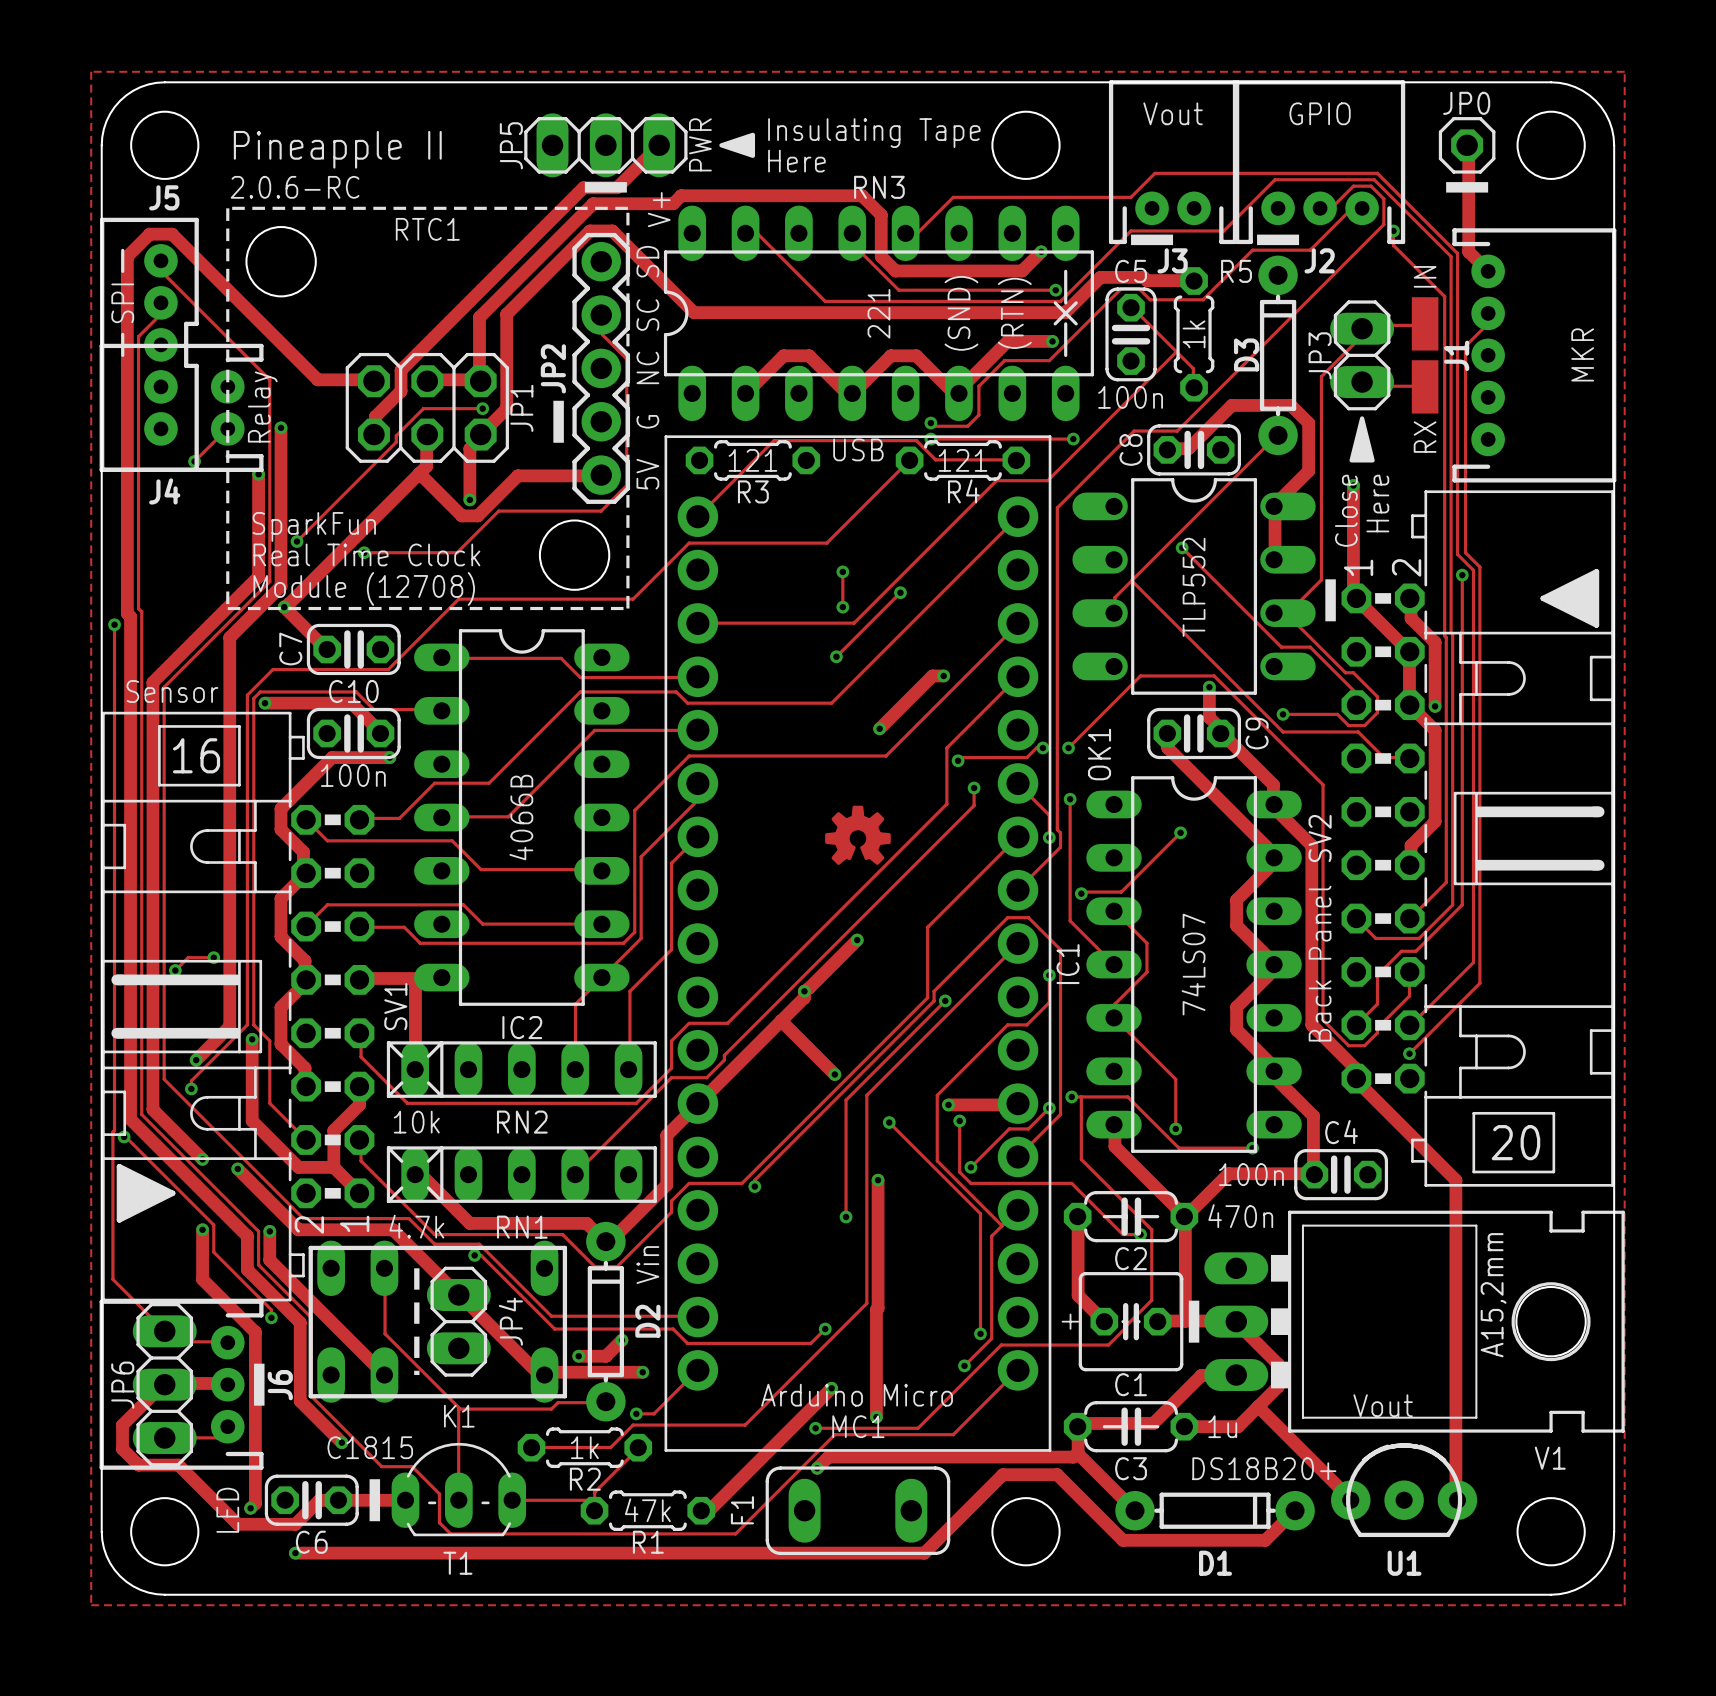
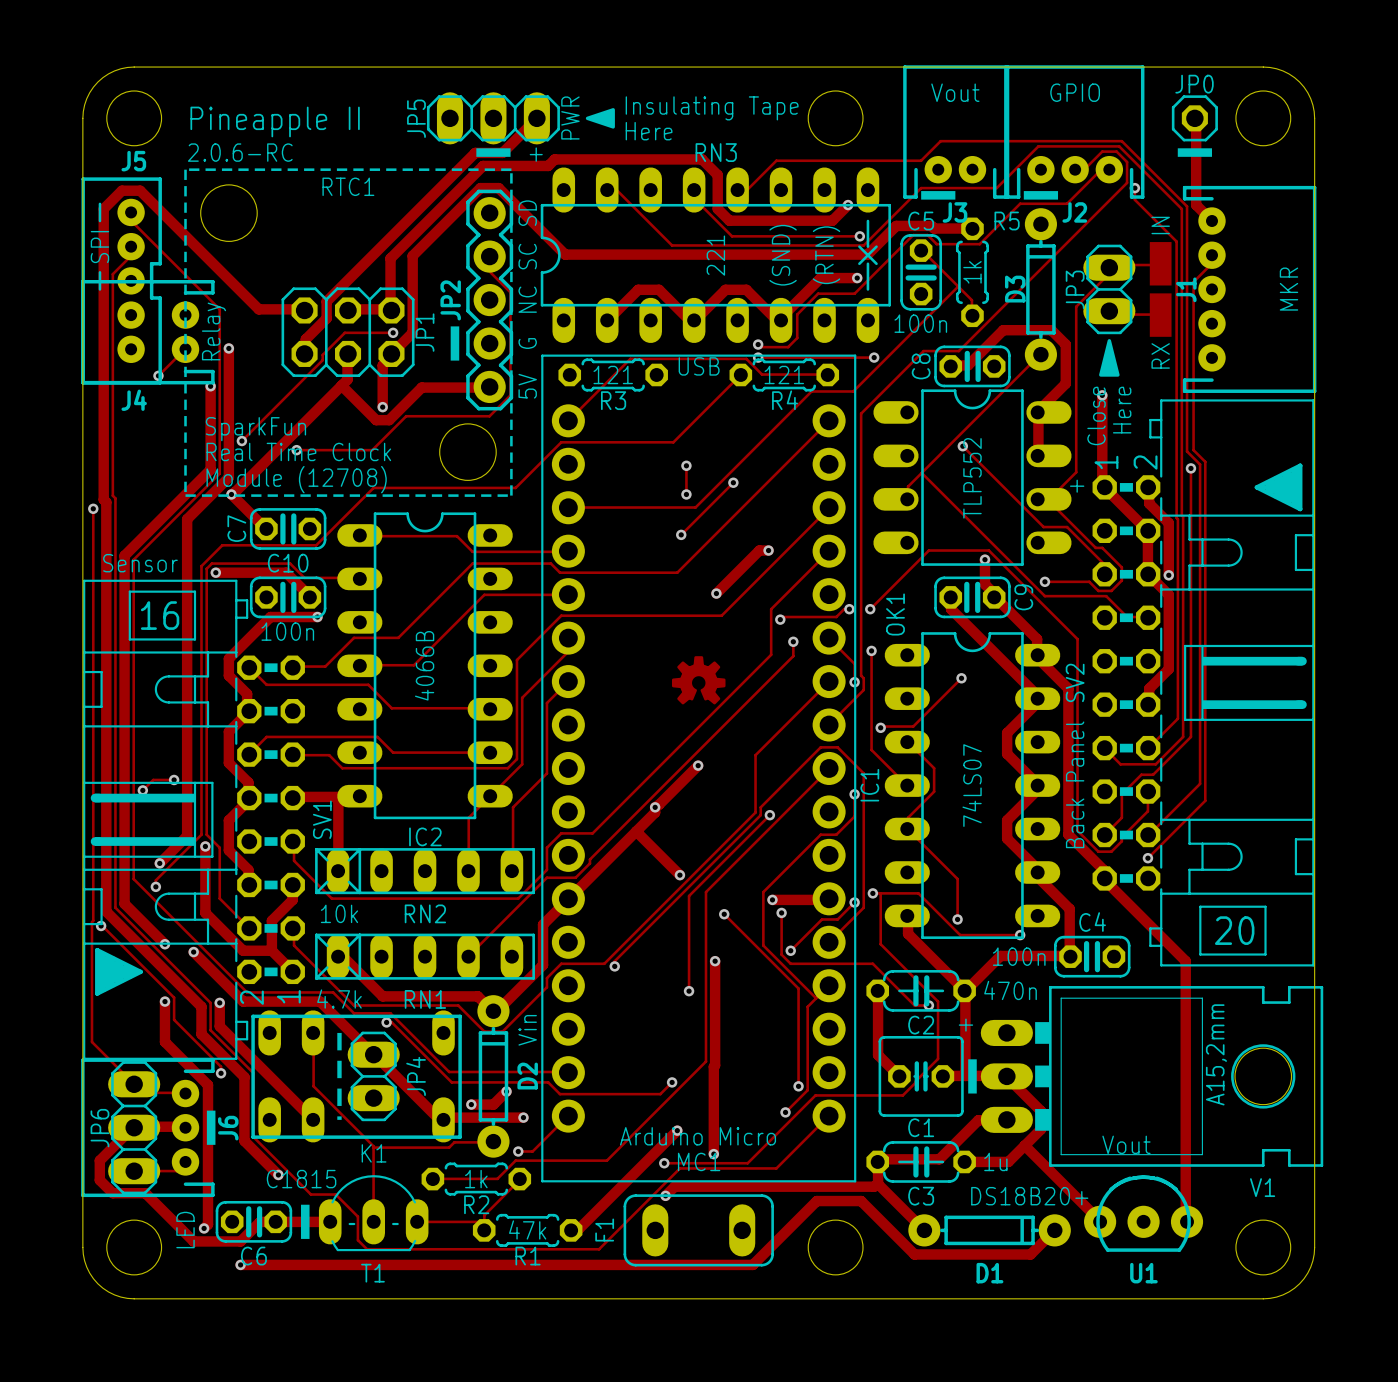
zone outline: (91, 71) (1624, 71) (1624, 1605) (91, 1605) (91, 71) -> none
text: V+ (659, 209) -> + (536, 154)
drawing: [1325, 579, 1336, 622] -> none
text: none -> + (1077, 486)
text position: + (1070, 1321) -> + (965, 1025)

